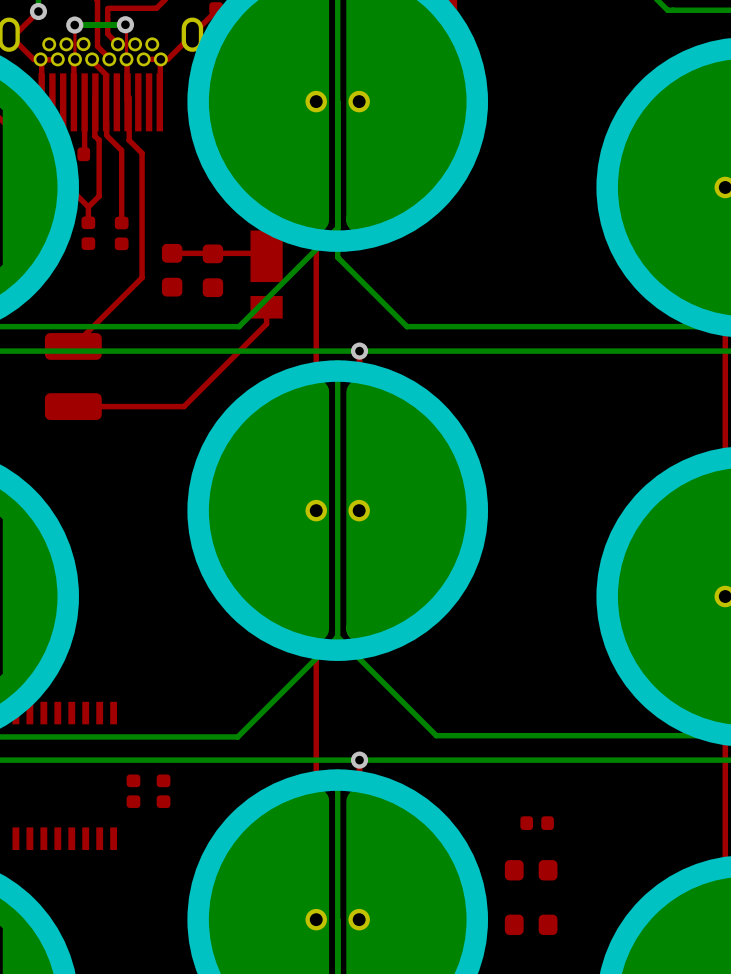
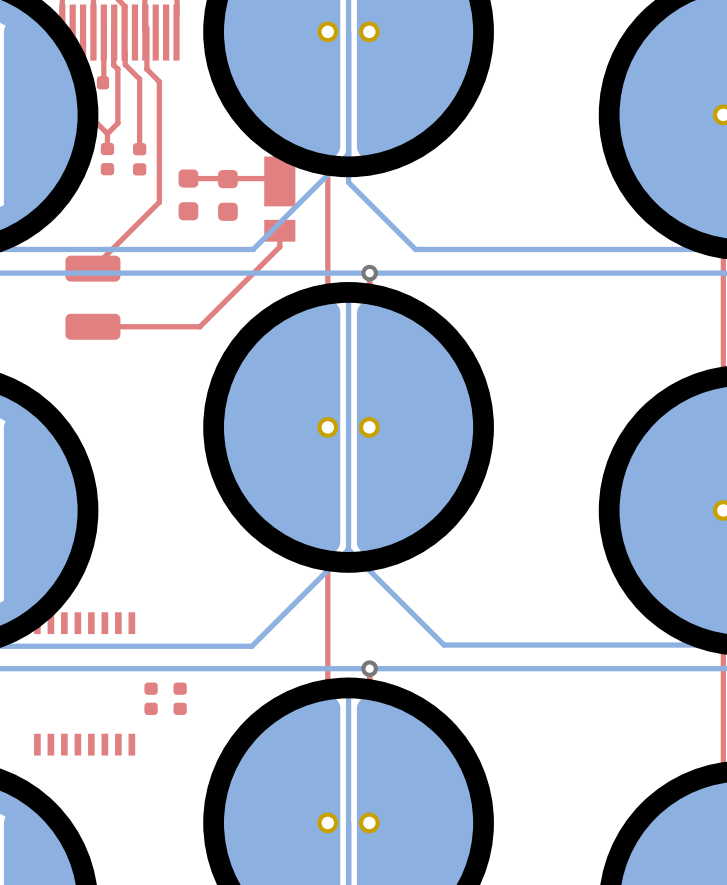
part: (537, 823) -> none
part: (531, 870) -> none
part: (531, 924) -> none

